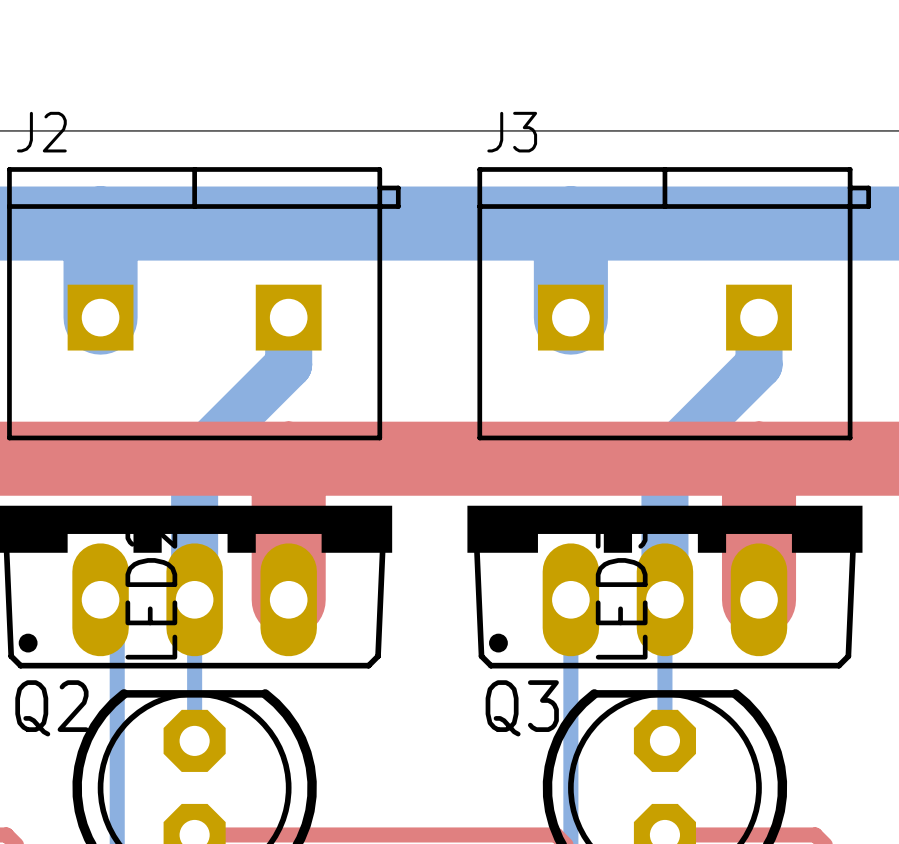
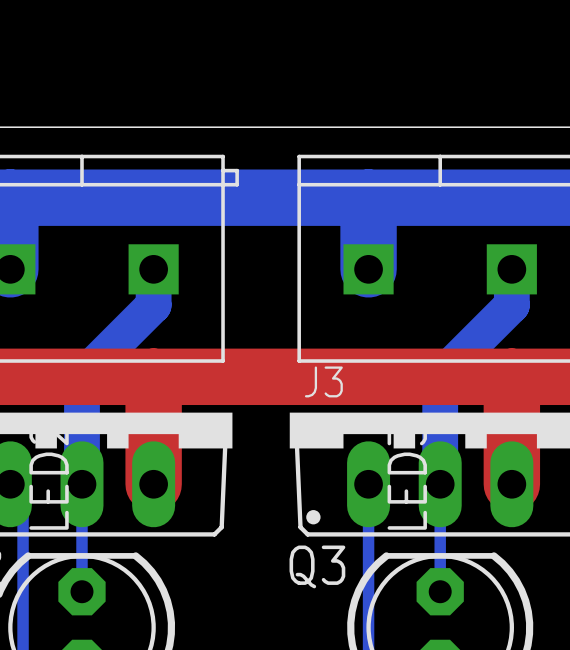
J3 name position: J3 (512, 132) -> J3 (323, 381)
Q3 name position: Q3 (522, 708) -> Q3 (317, 566)

